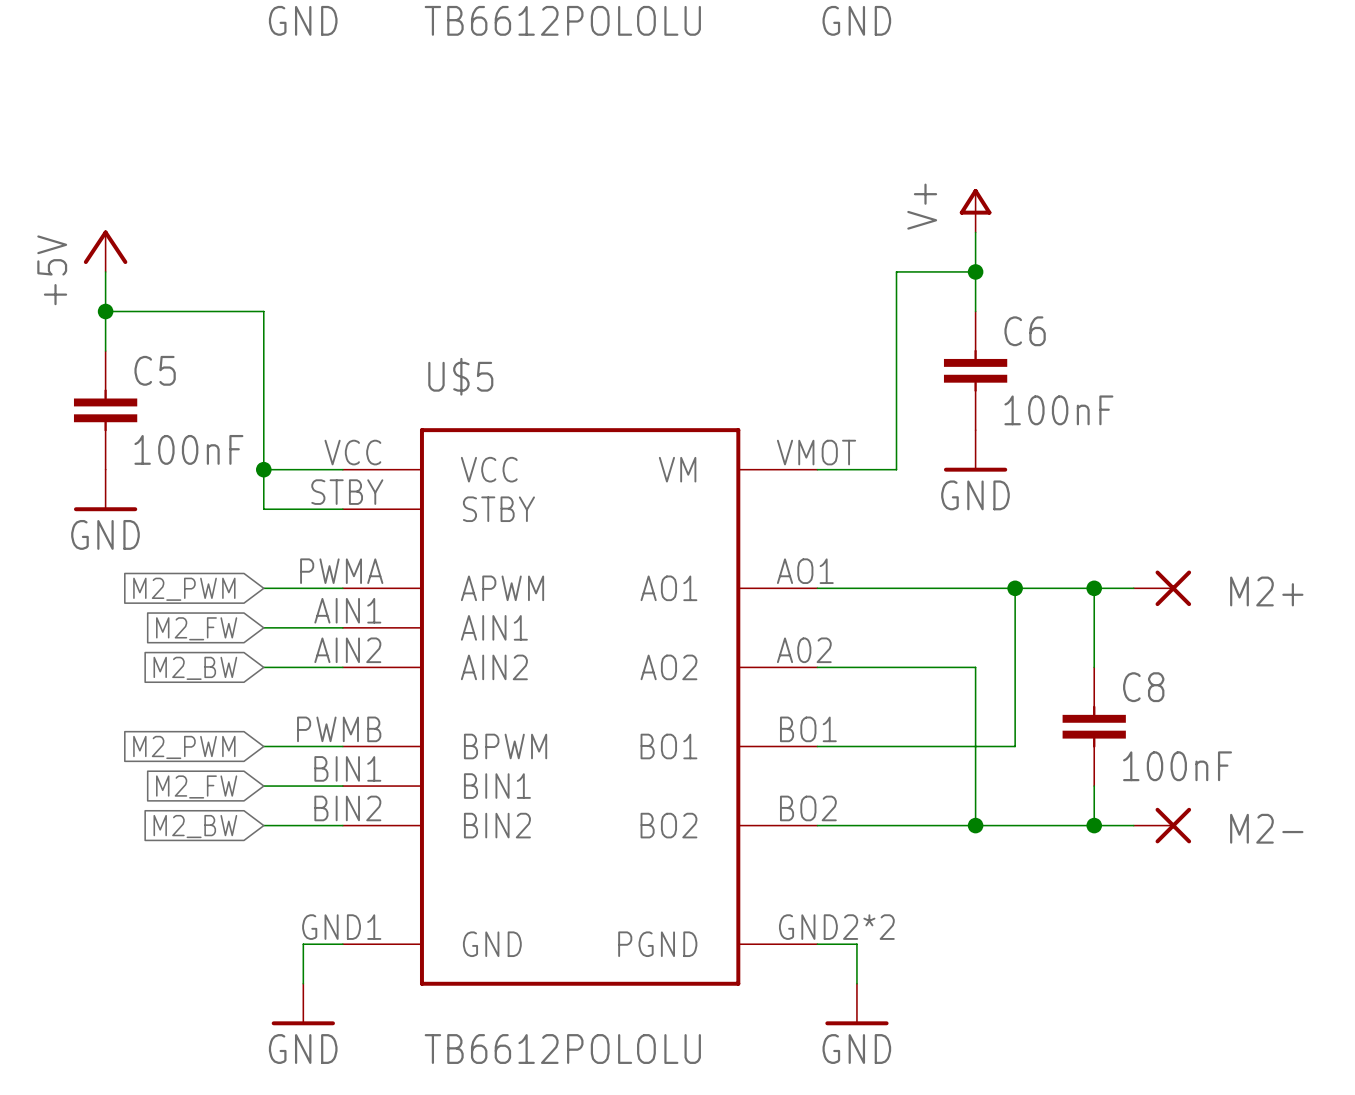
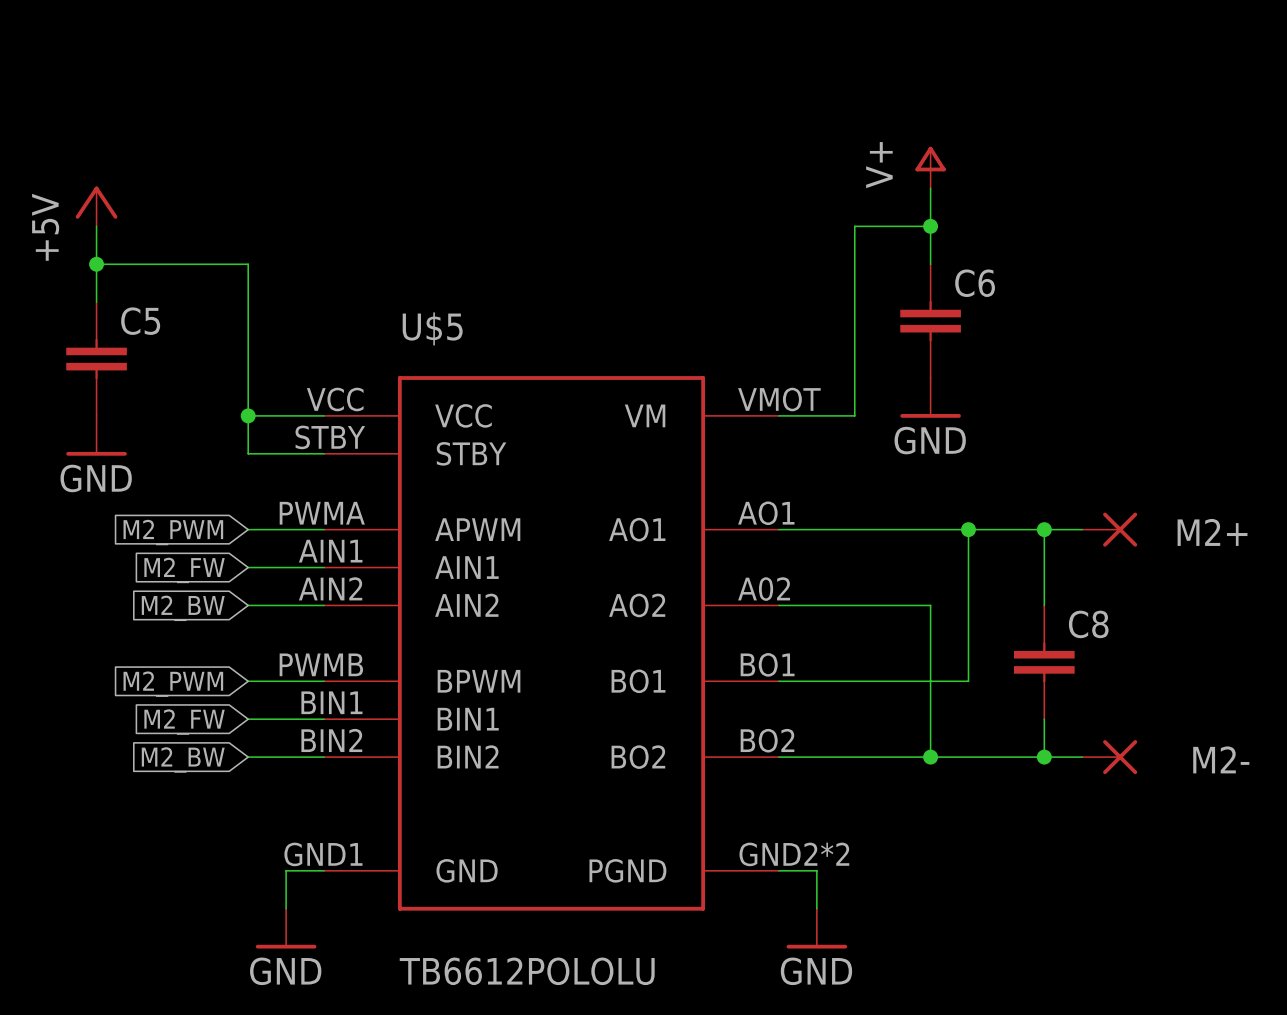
C6 value: 100nF (1058, 410) -> none
C5 value: 100nF (188, 449) -> none
C8 value: 100nF (1177, 766) -> none

